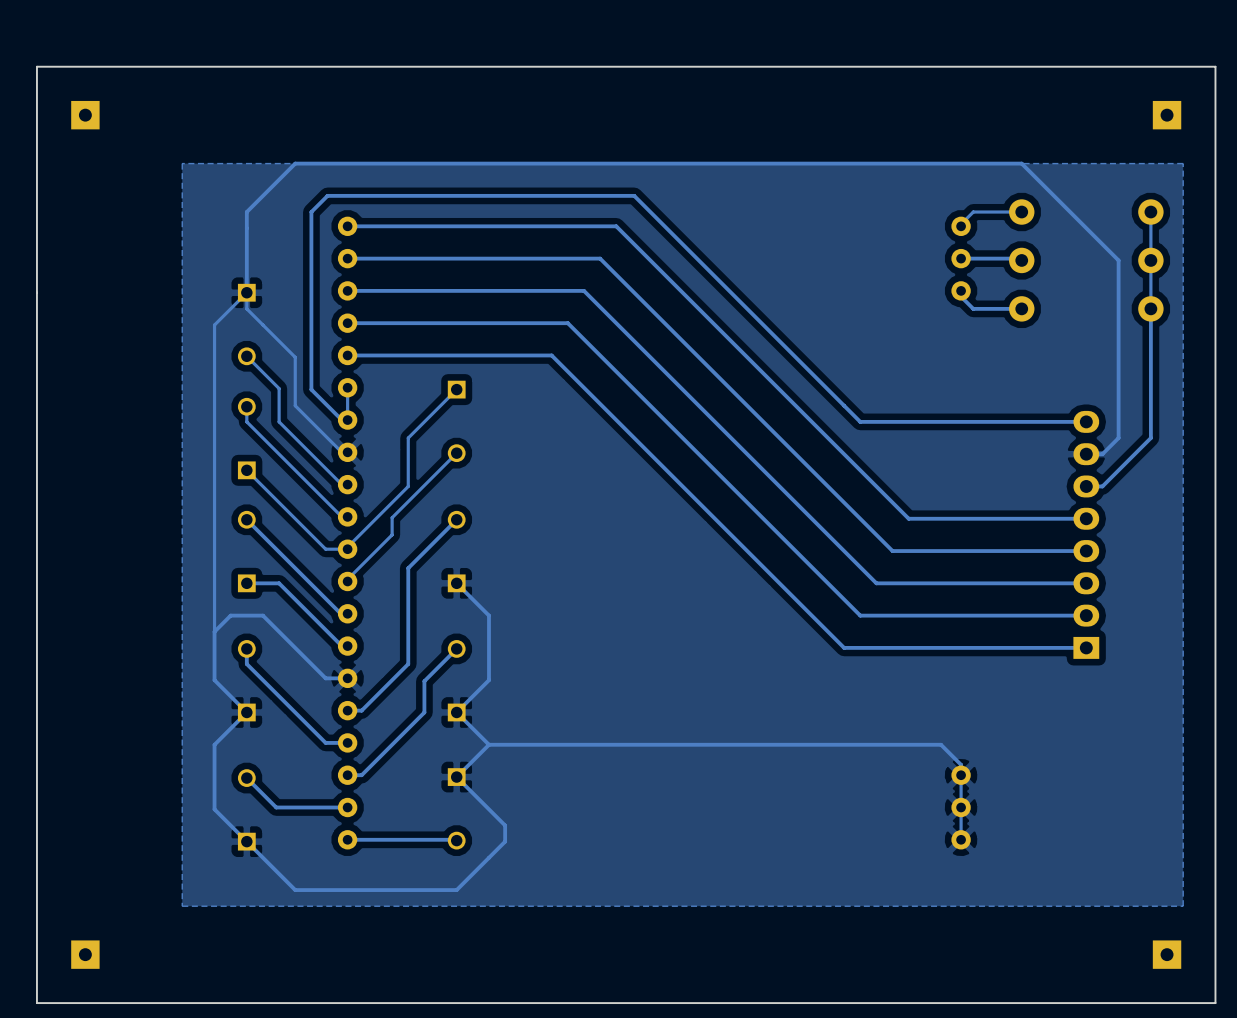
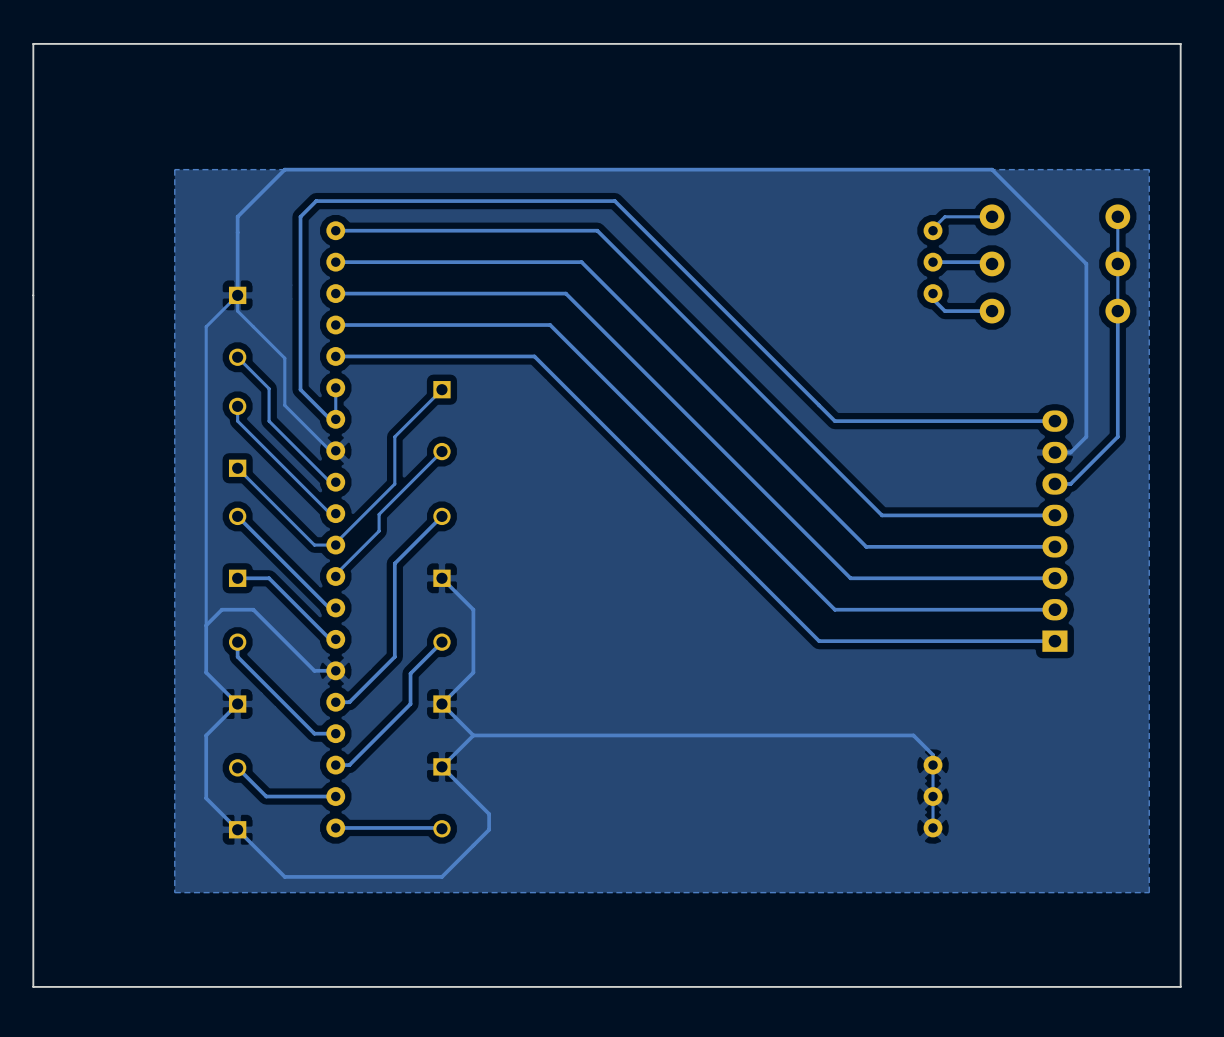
board edge: (1215, 66) (36, 66) -> (1180, 75) (1180, 43) (33, 43) (33, 75)
part: (85, 115) -> none
part: (1167, 115) -> none
part: (85, 954) -> none
part: (1167, 954) -> none

